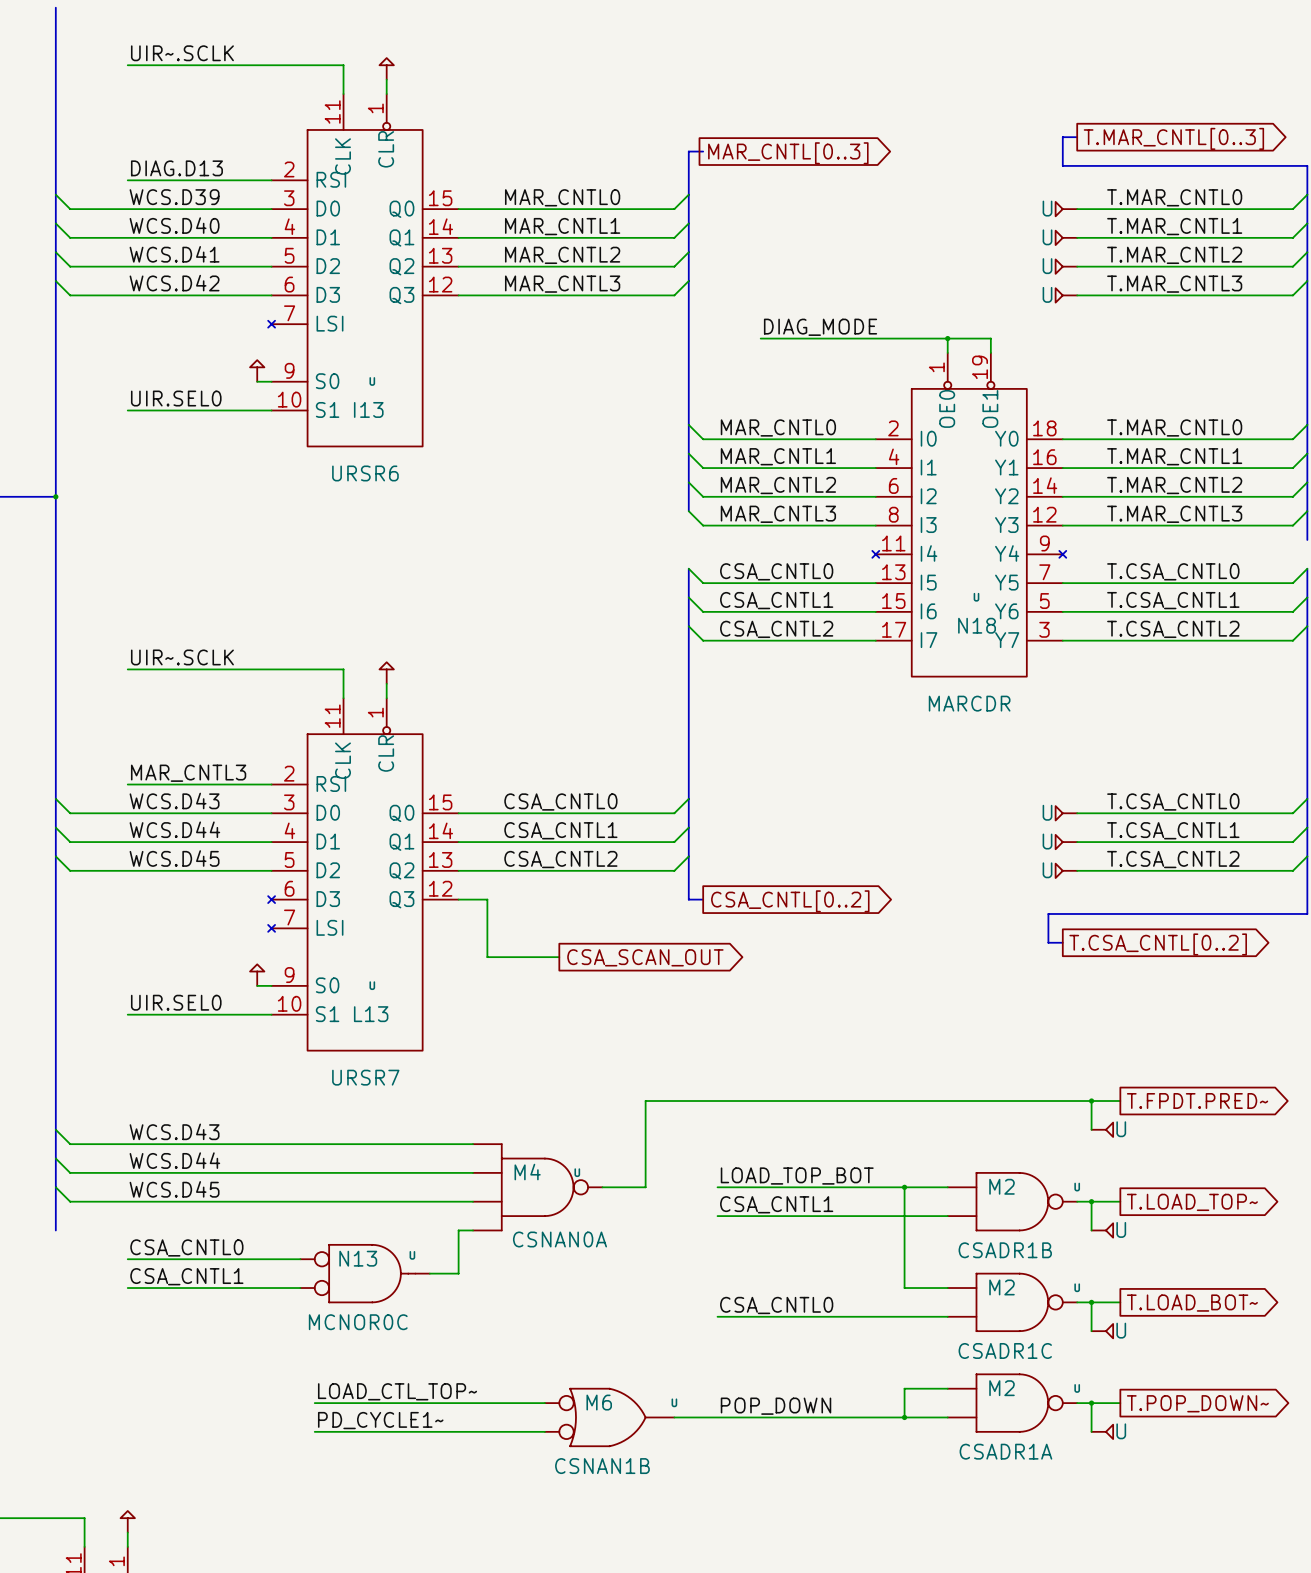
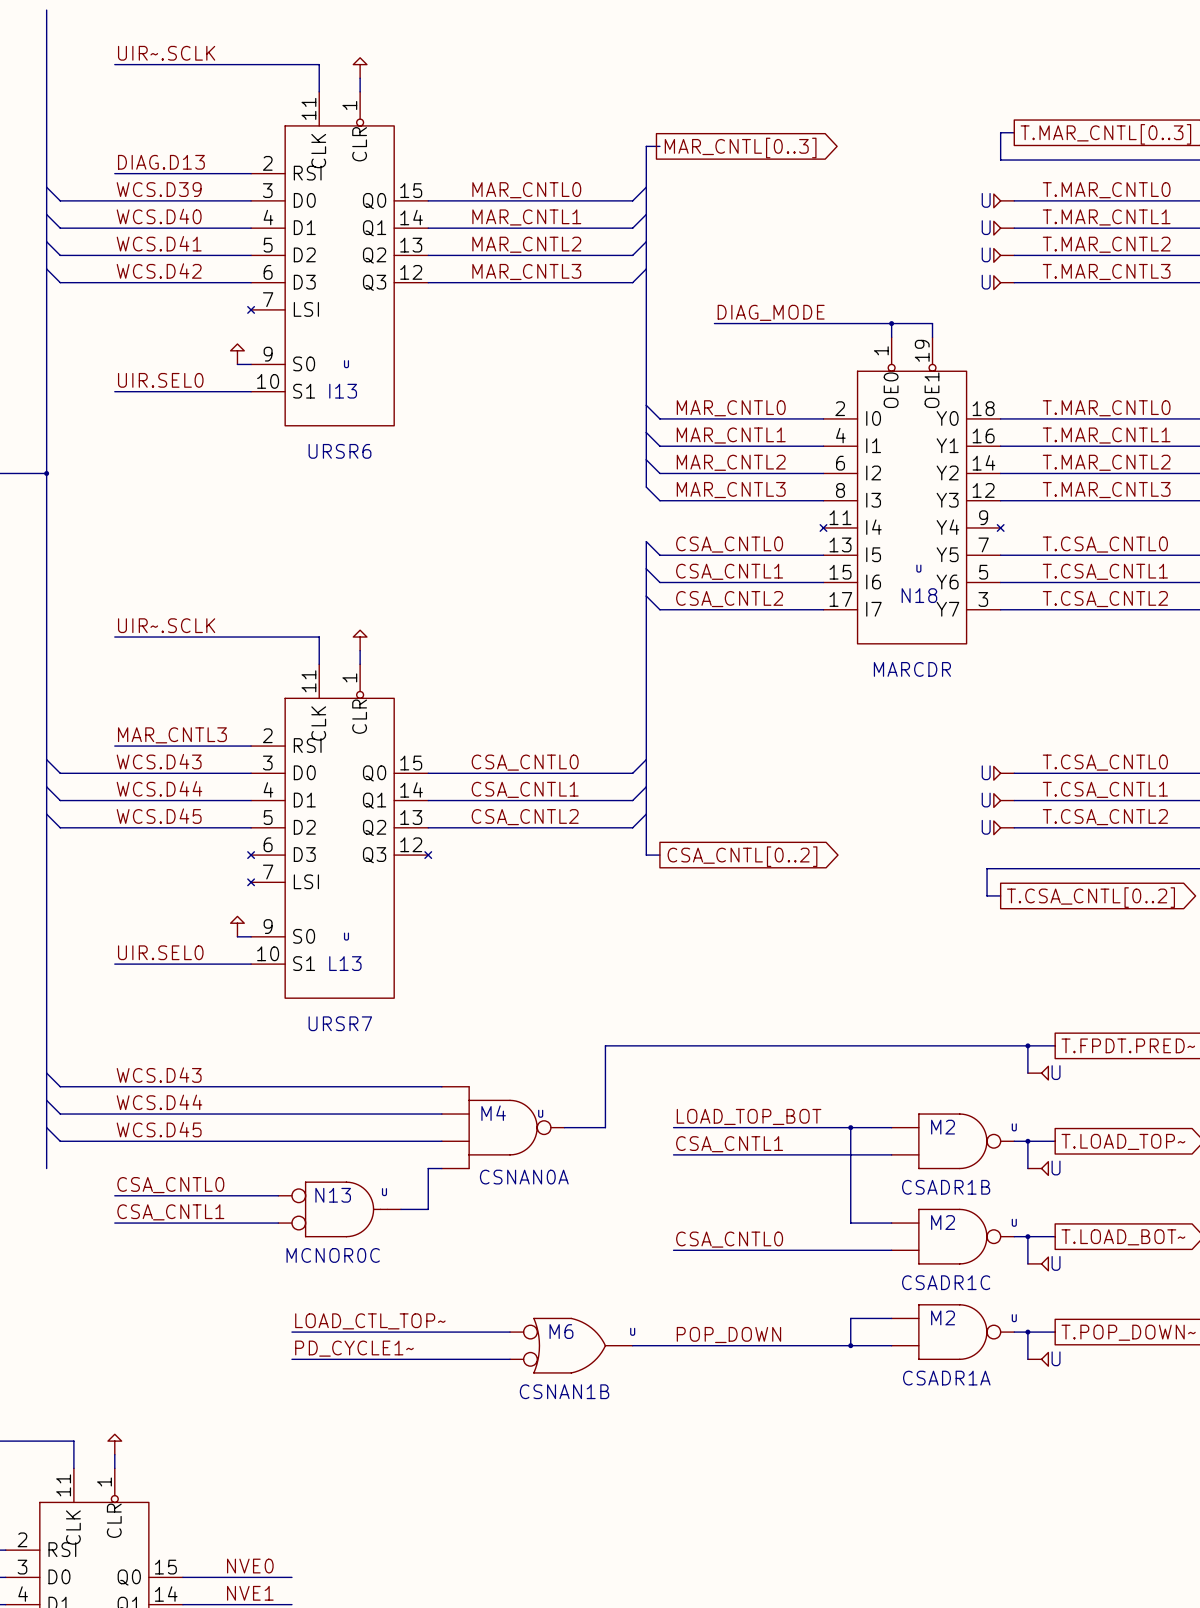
wire: (458, 899) (487, 899) (487, 957) (559, 957) -> none
no-connect mark: none -> (428, 855)
global label: CSA_SCAN_OUT (645, 957) -> none

